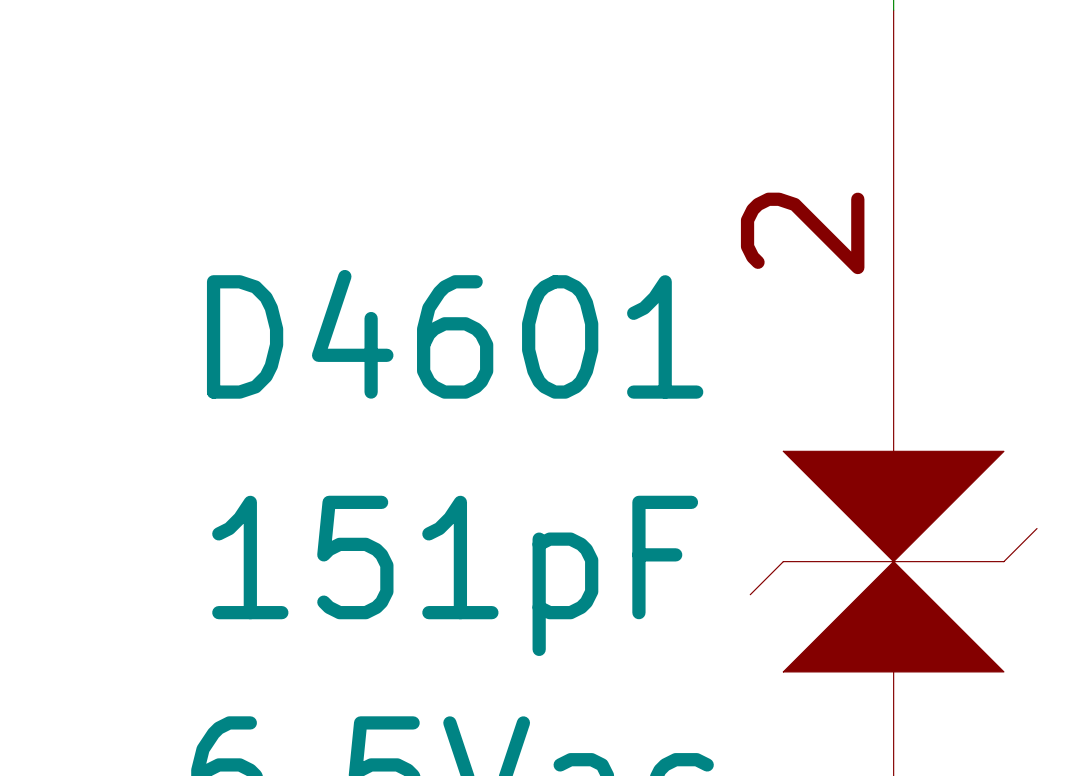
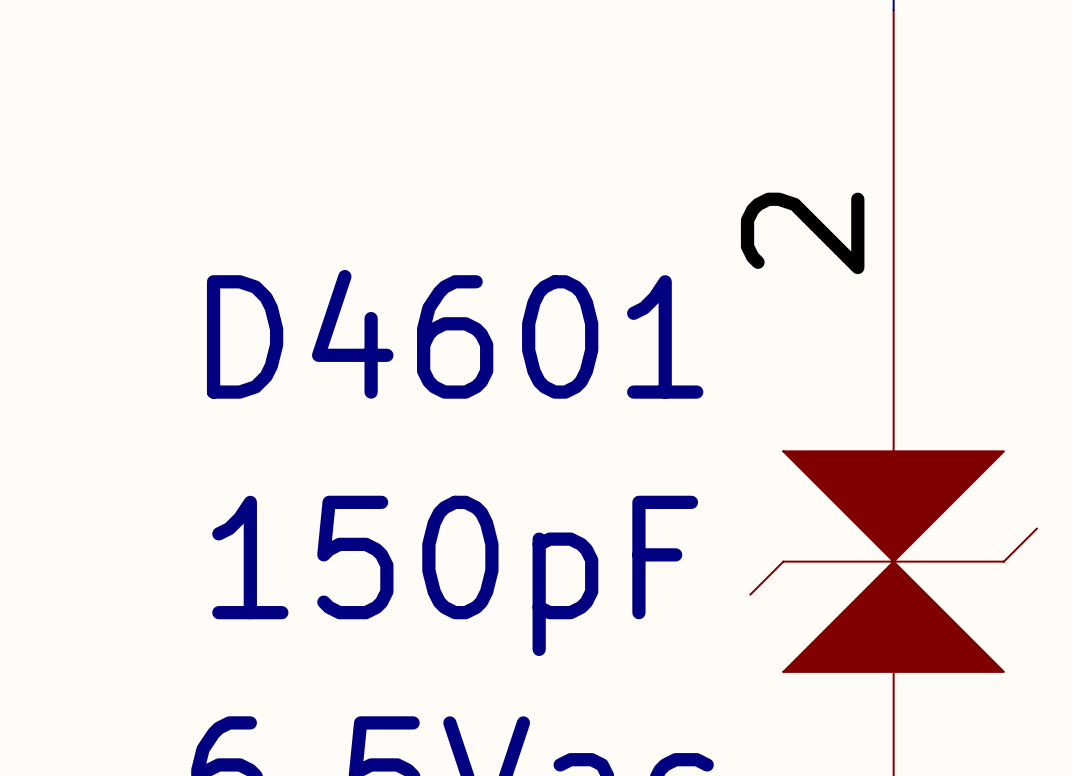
D4601 value: 151pF (455, 575) -> 150pF (455, 575)

